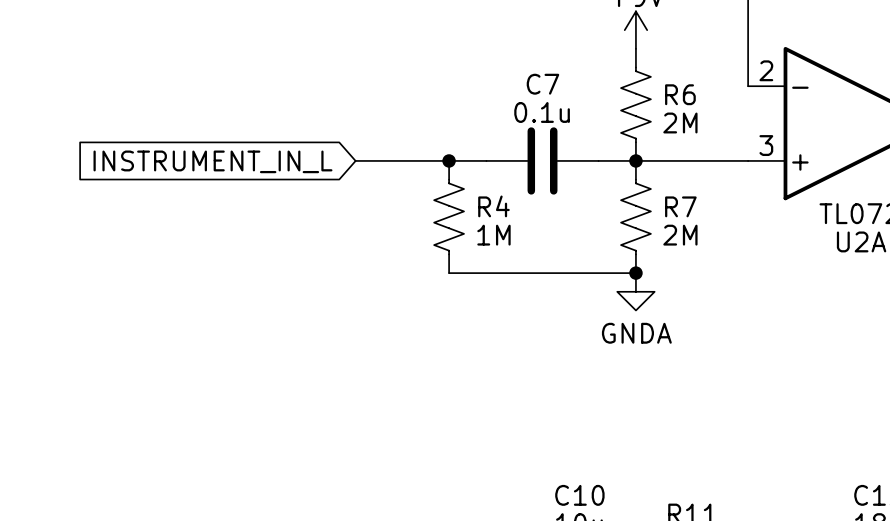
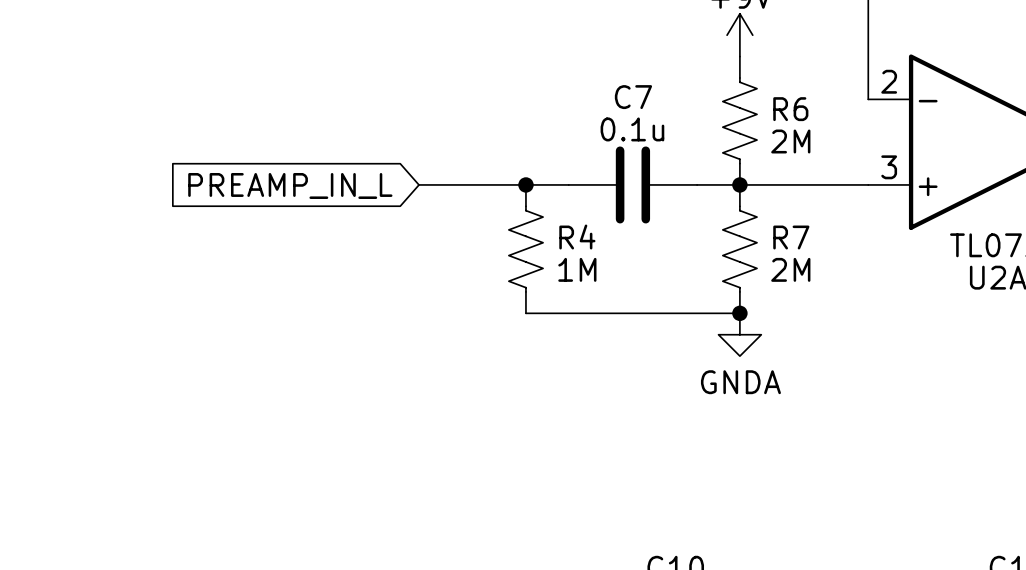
global label: INSTRUMENT_IN_L (212, 161) -> PREAMP_IN_L (290, 185)

